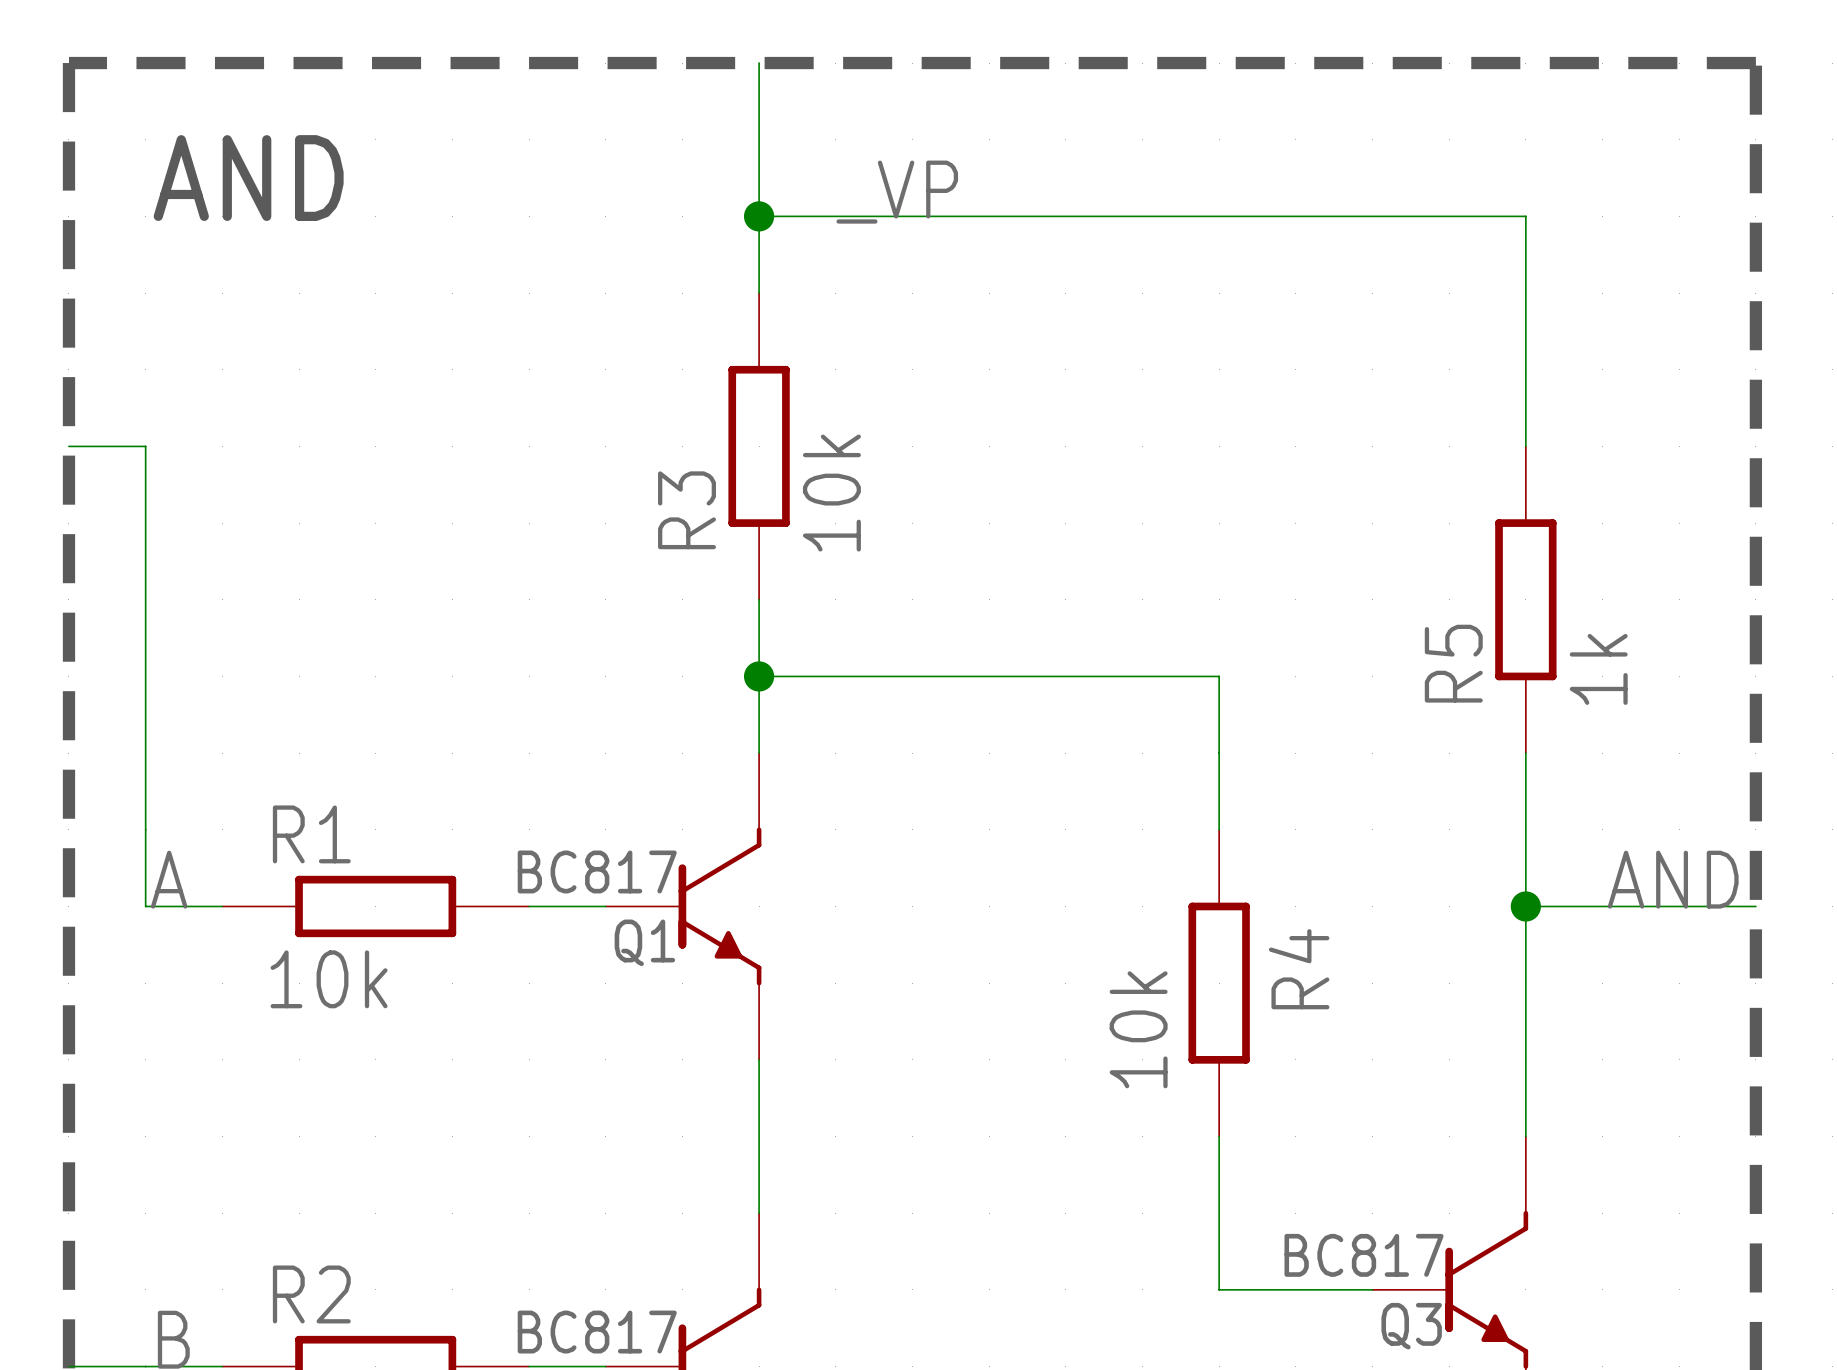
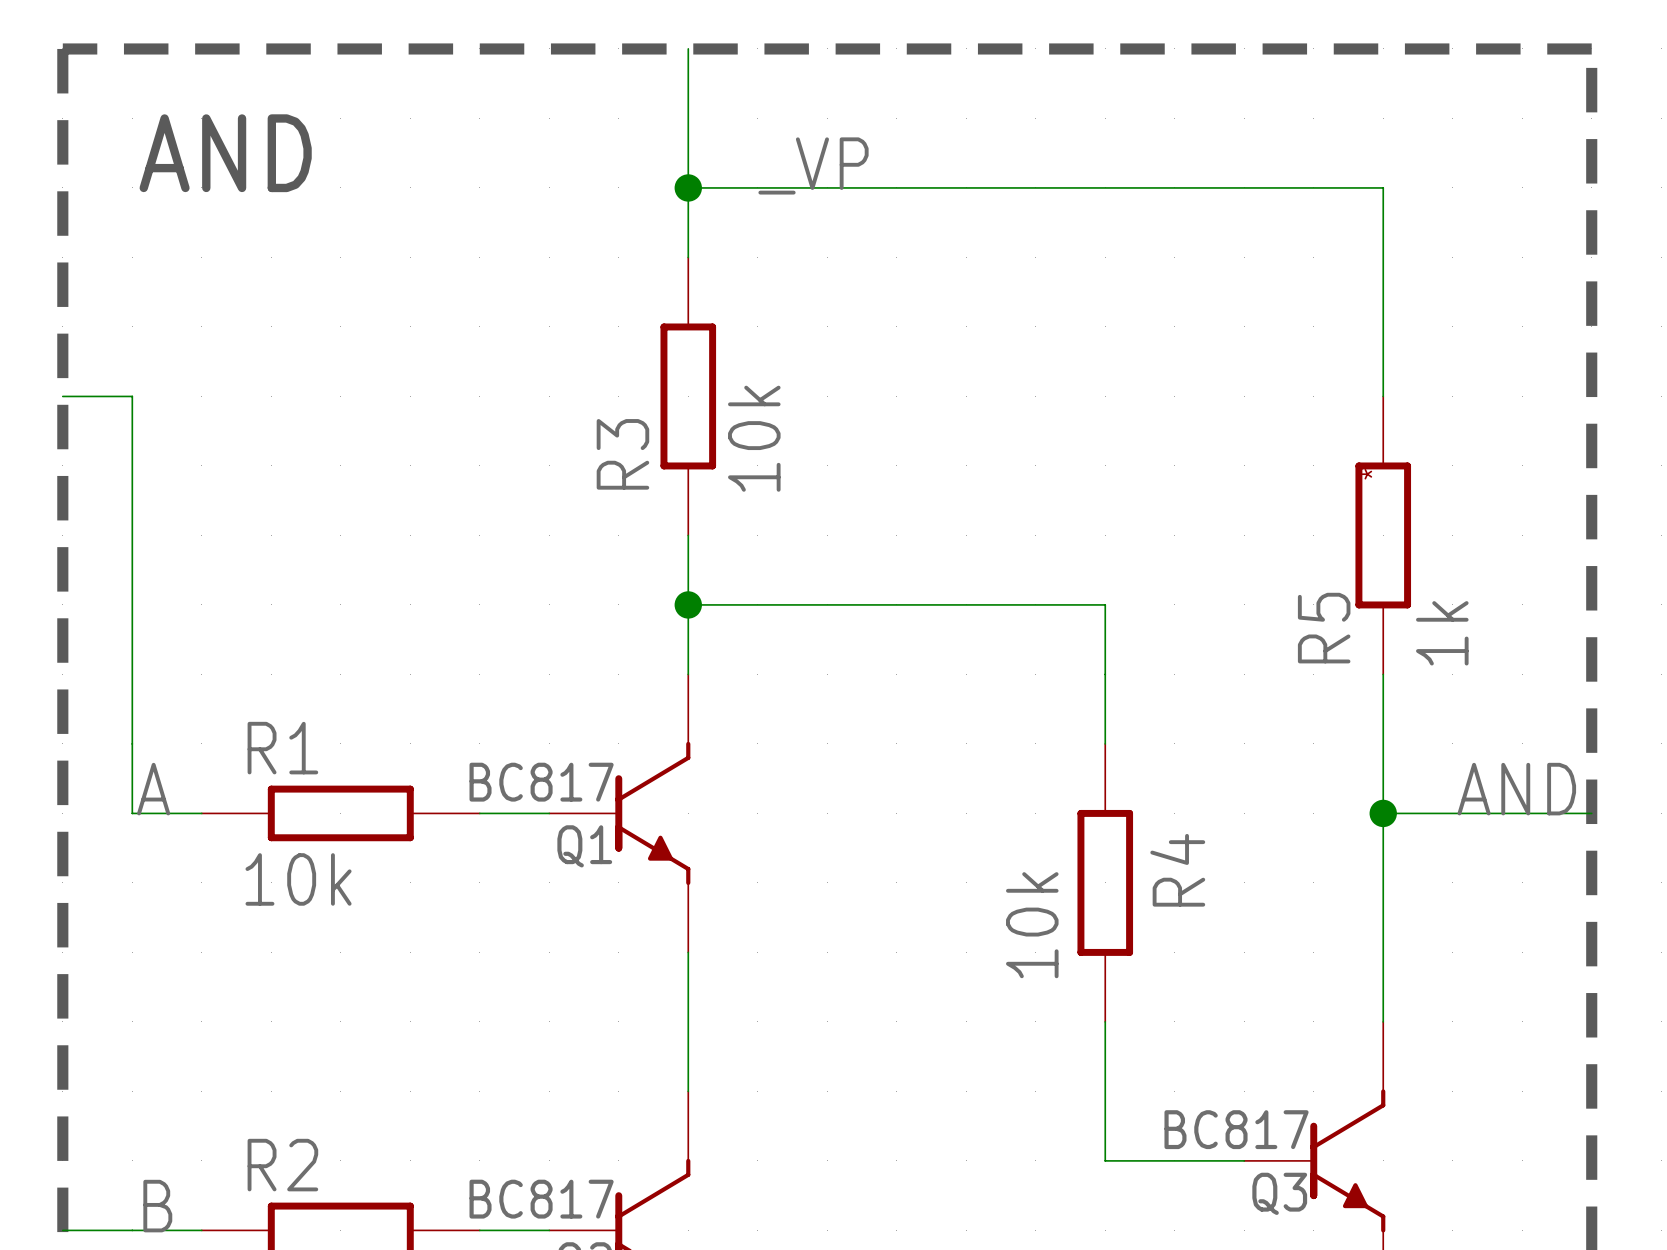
R5 text: none -> * (1366, 474)
R5 name position: R5 (1453, 663) -> R5 (1324, 628)
R5 value position: 1k (1598, 669) -> 1k (1442, 633)

